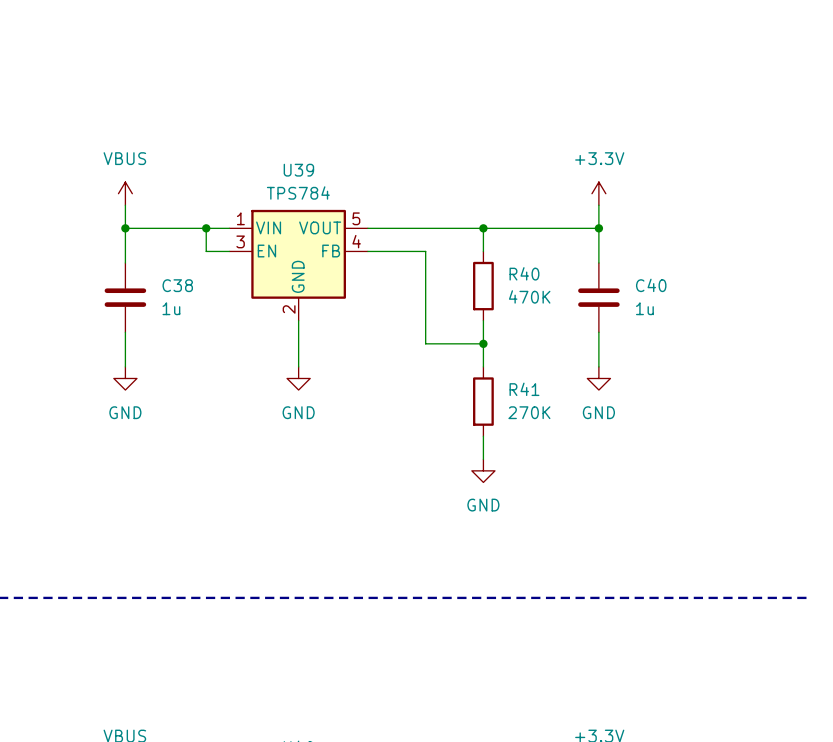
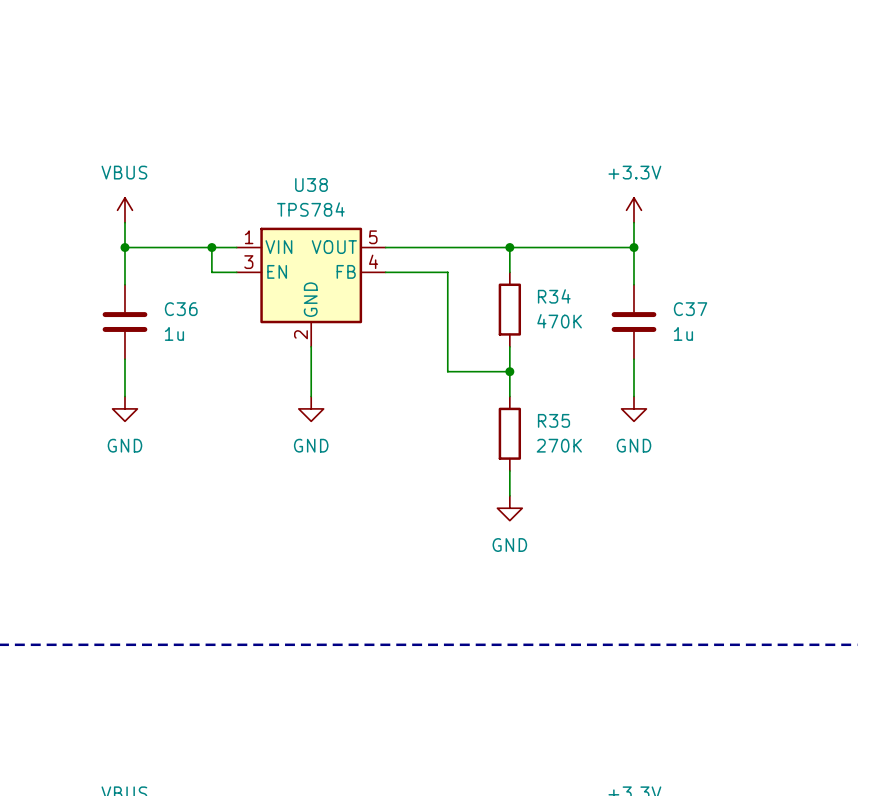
U39 name: U39 (298, 170) -> U38 (311, 184)
R40 name: R40 (524, 273) -> R34 (554, 296)
C38 name: C38 (177, 285) -> C36 (181, 309)
C40 name: C40 (651, 285) -> C37 (690, 309)
R41 name: R41 (524, 389) -> R35 (553, 420)

